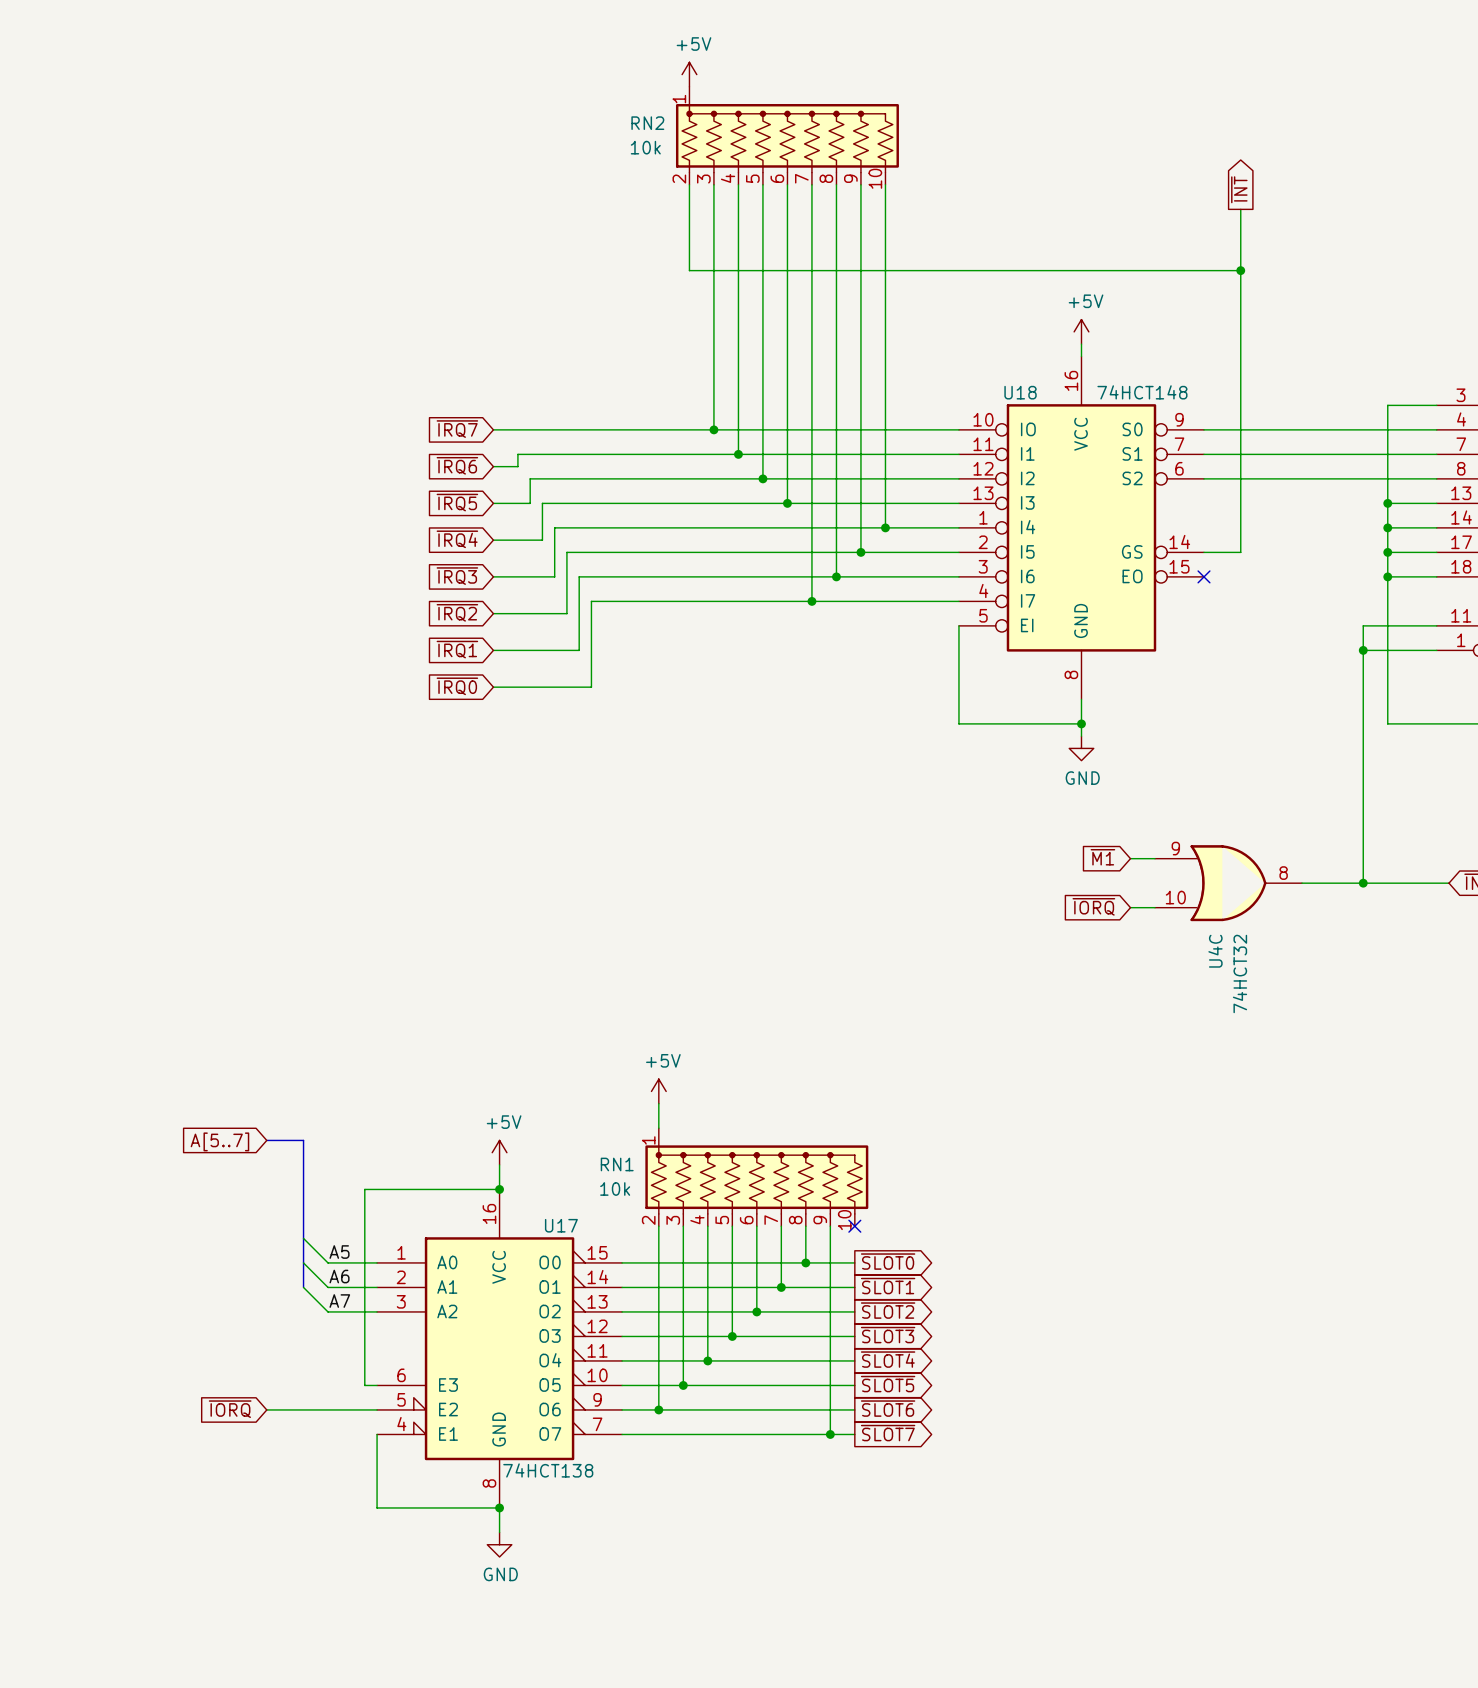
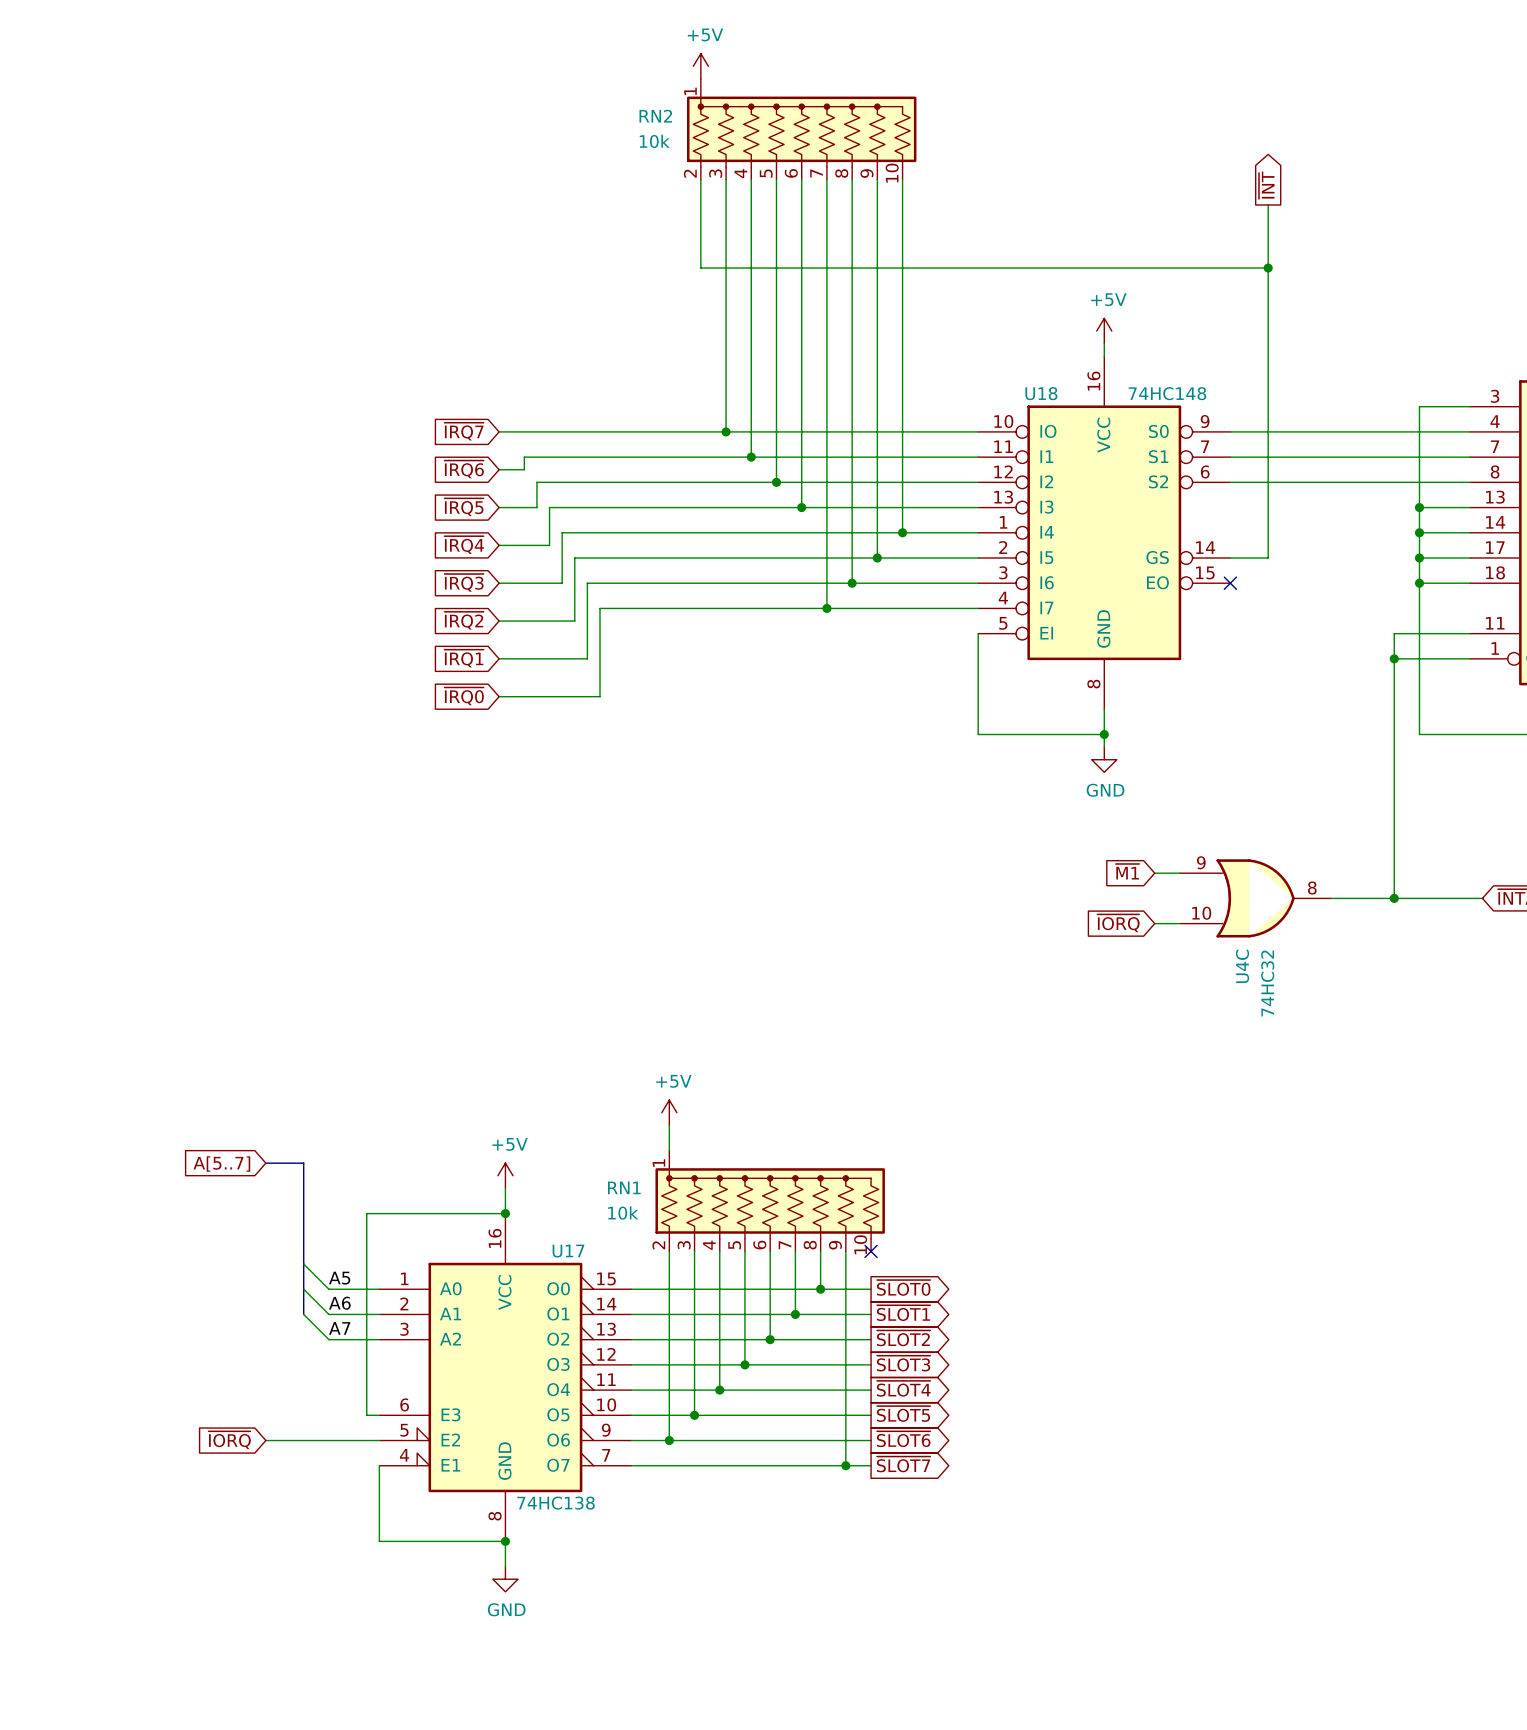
U18 value: 74HCT148 (1142, 392) -> 74HC148 (1167, 393)
U4C value: 74HCT32 (1240, 973) -> 74HC32 (1267, 983)
U17 value: 74HCT138 (548, 1470) -> 74HC138 (555, 1503)

